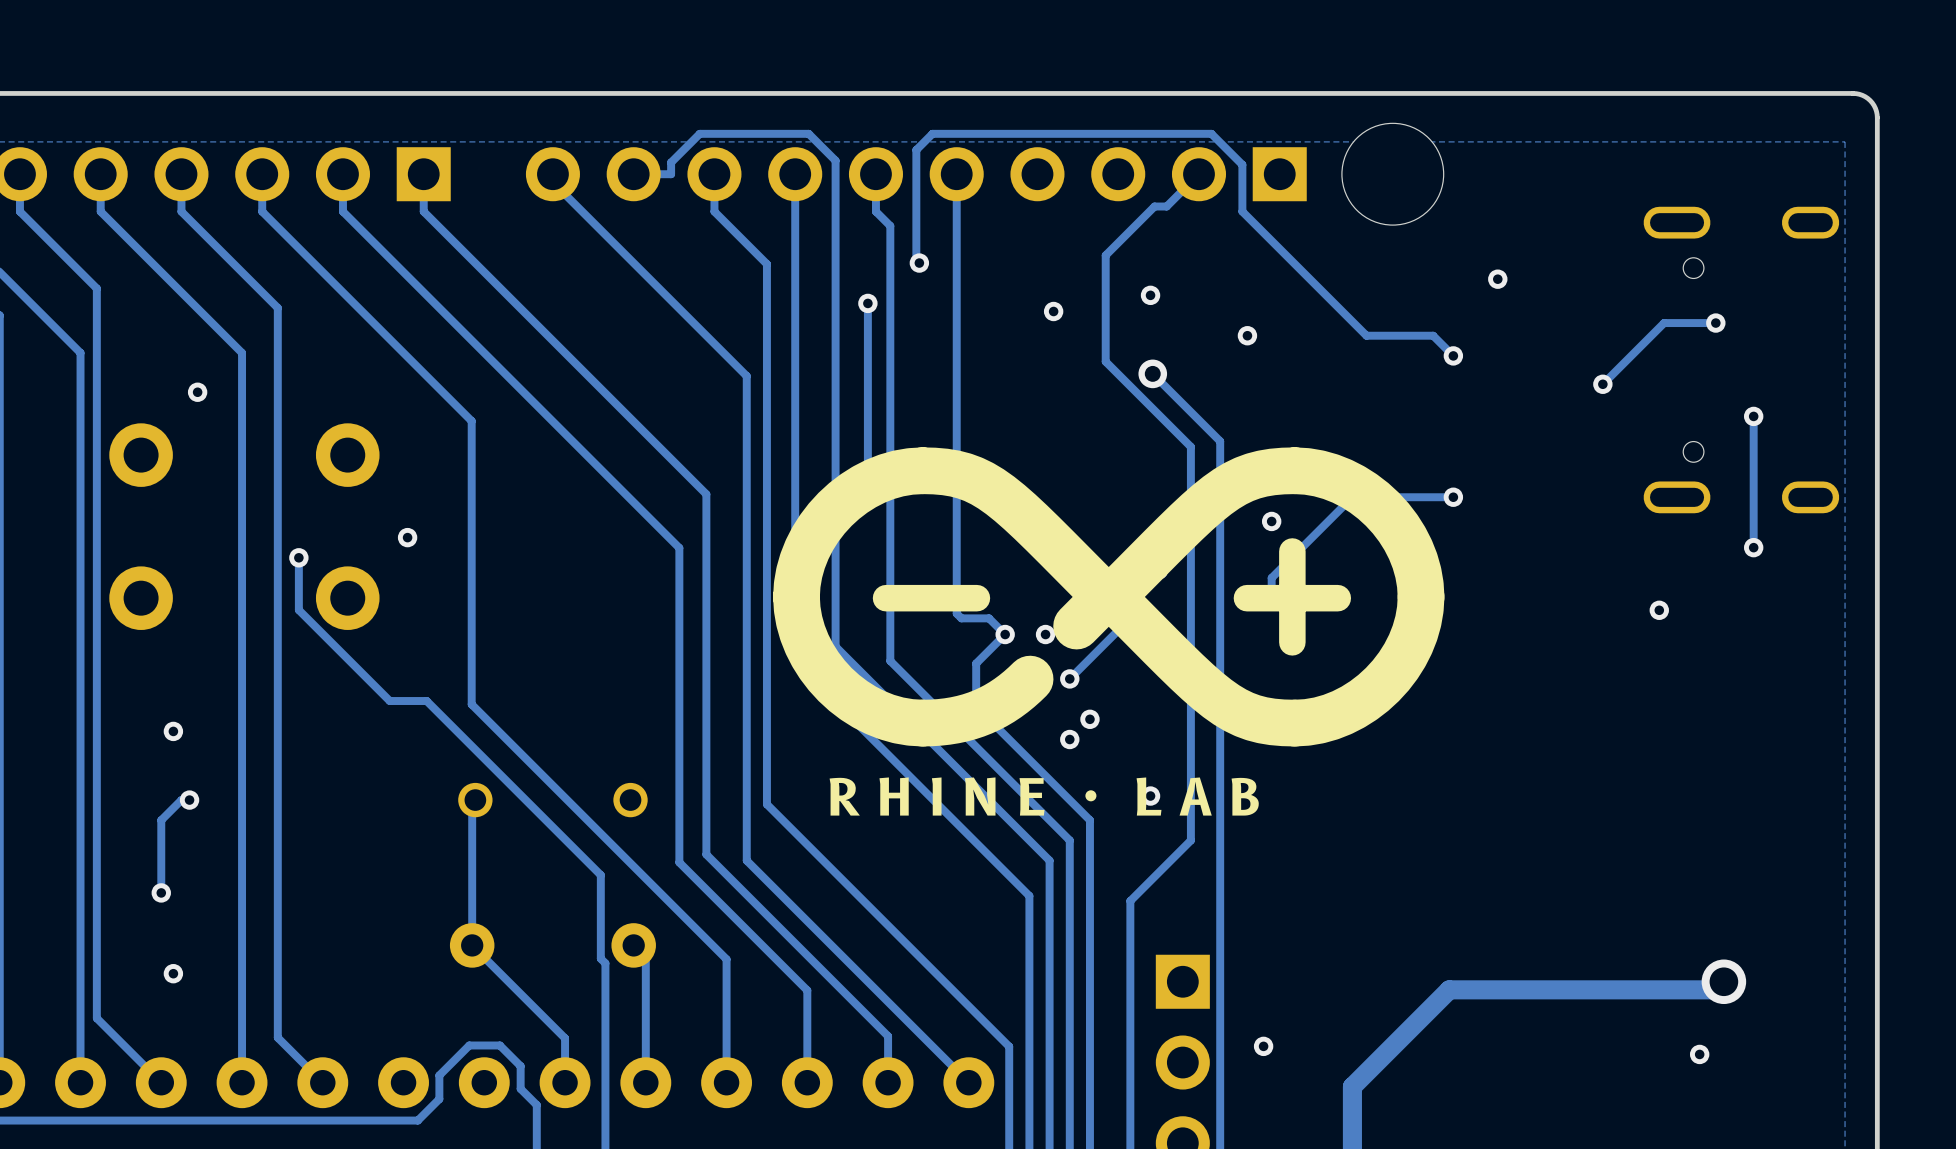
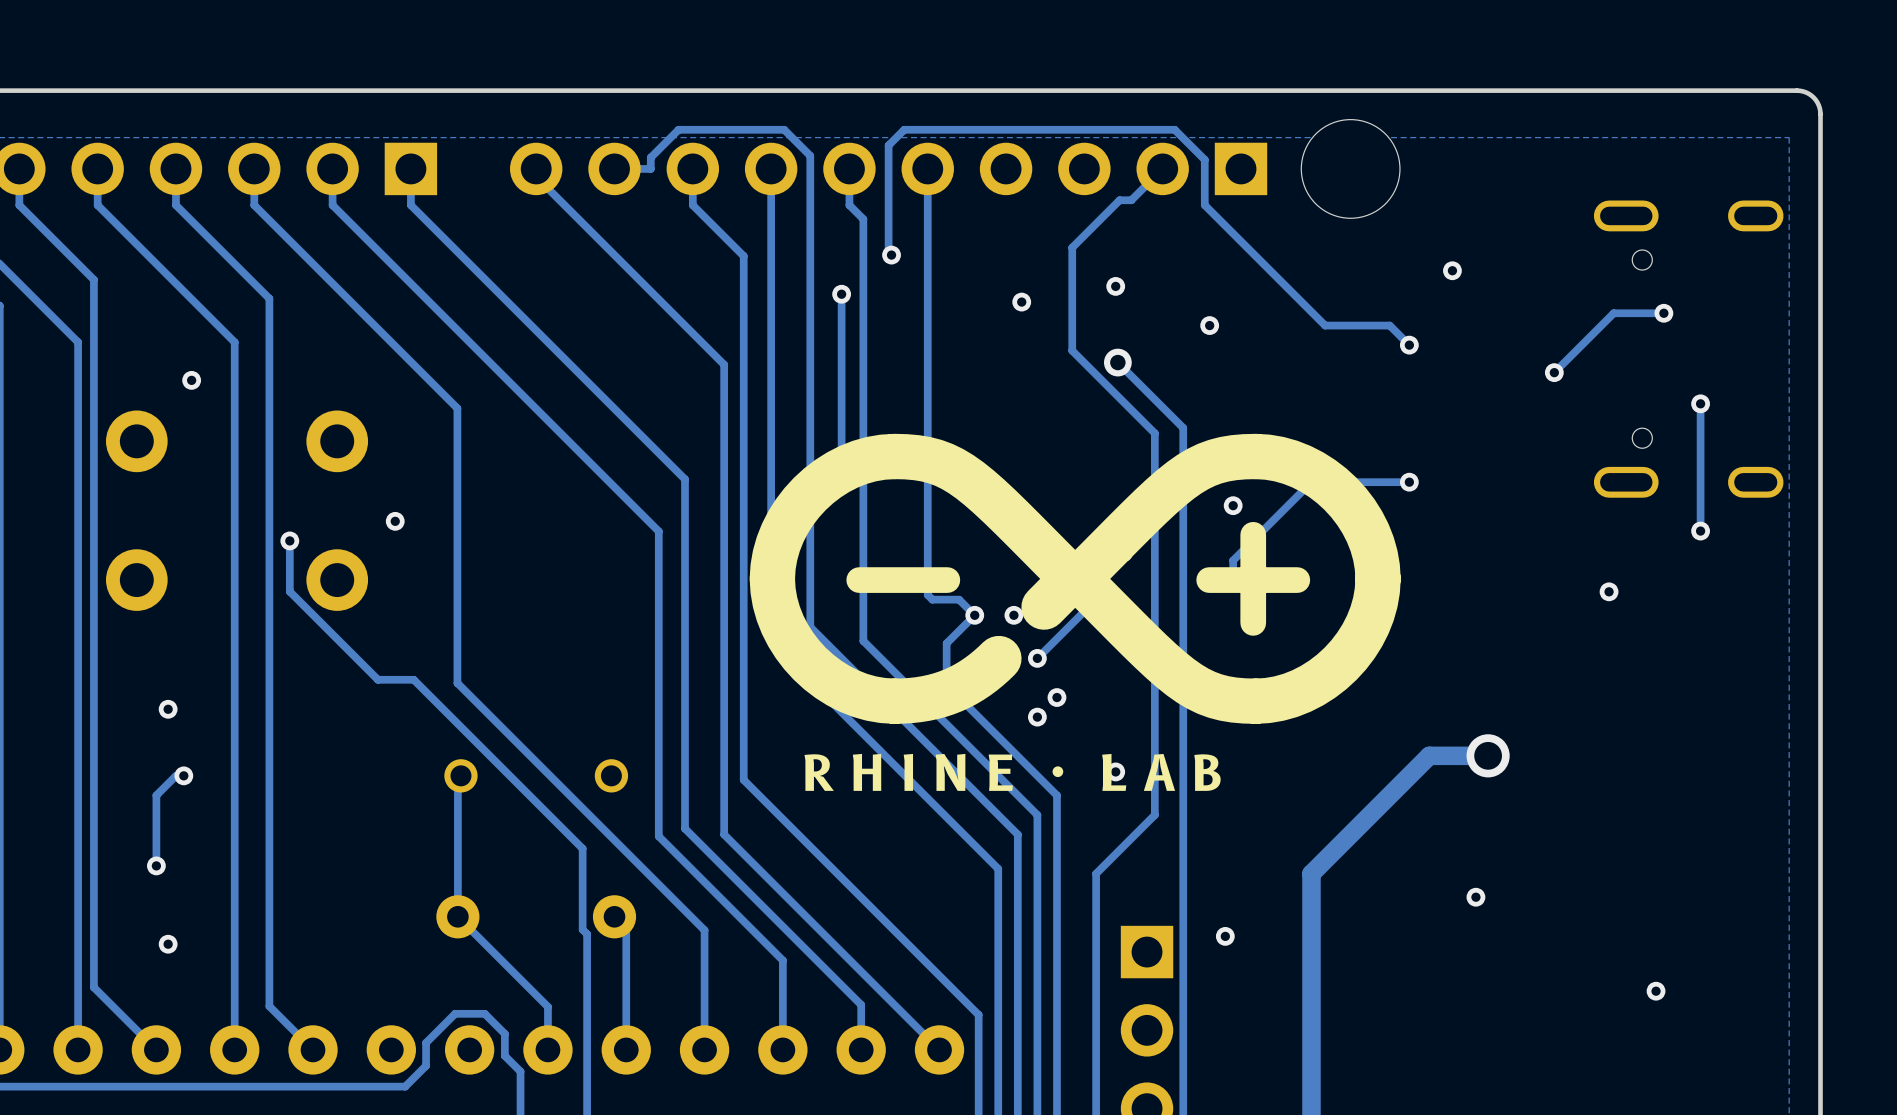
via: none -> (1488, 755)
via: none -> (1475, 897)
track: (1723, 981) (1715, 989) (1449, 989) (1352, 1086) -> (1488, 755) (1429, 755) (1311, 873) (1311, 1053)
via: (1723, 981) -> none
via position: (1263, 1046) -> (1225, 936)
via position: (1699, 1054) -> (1656, 991)

